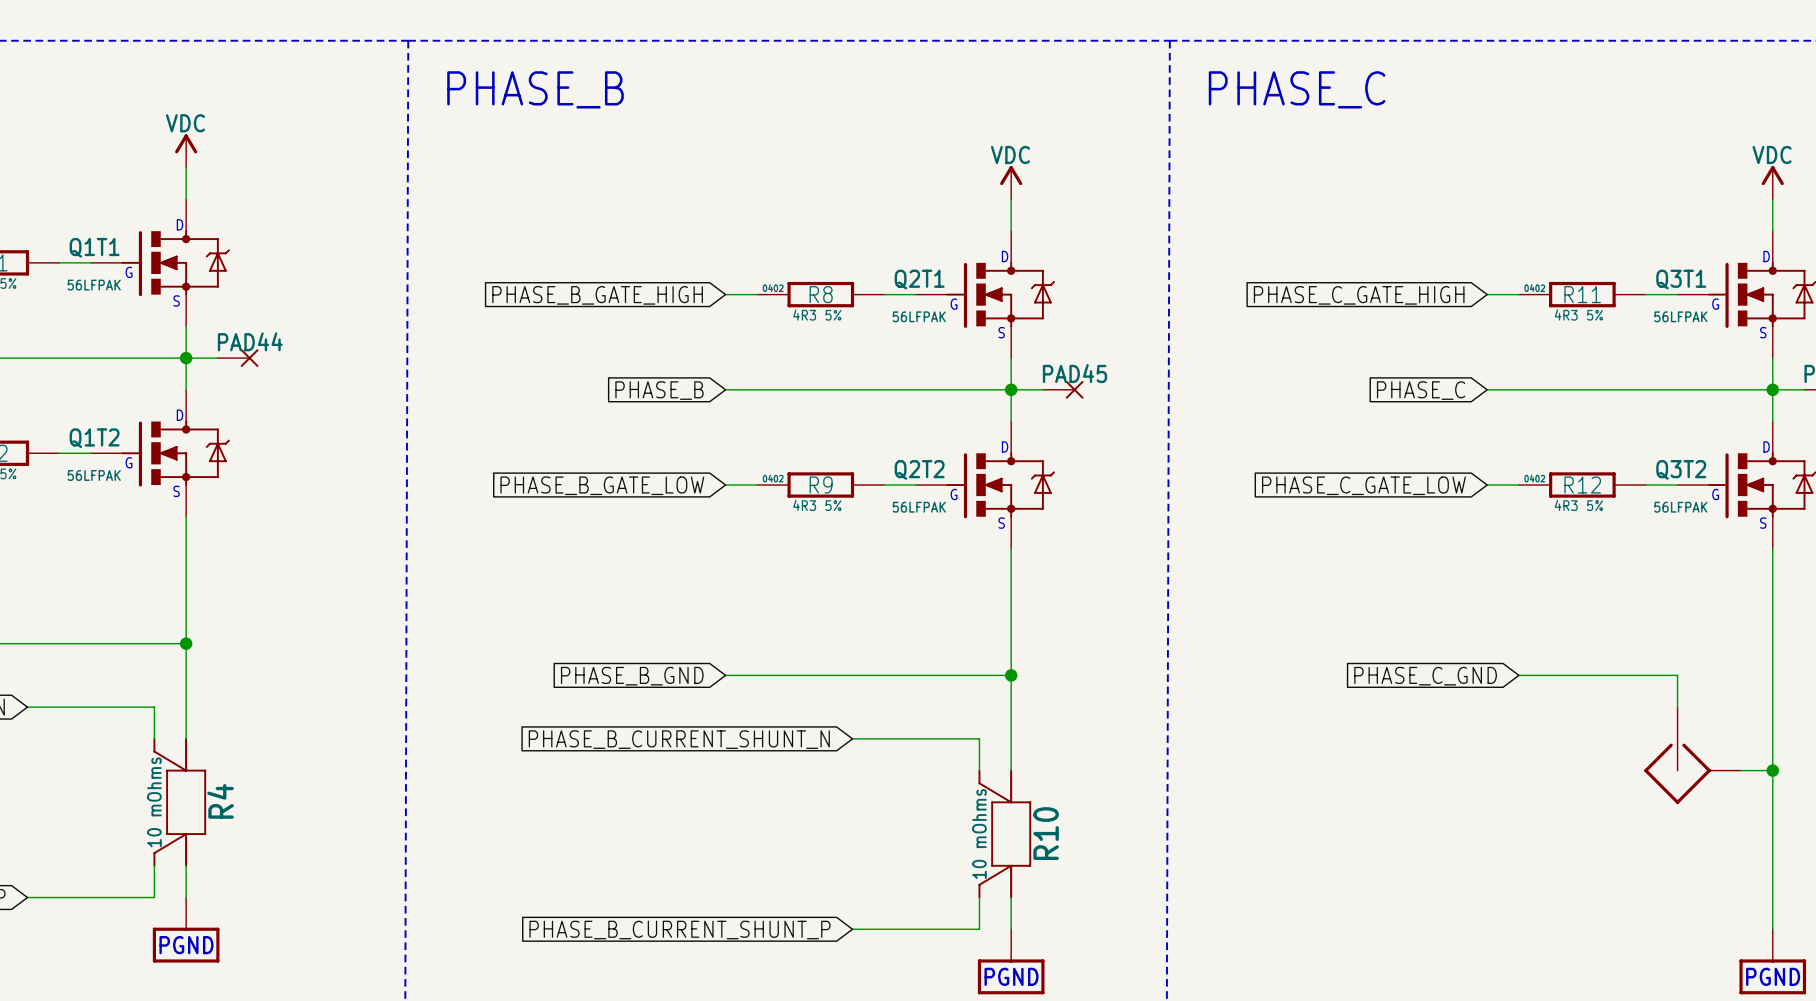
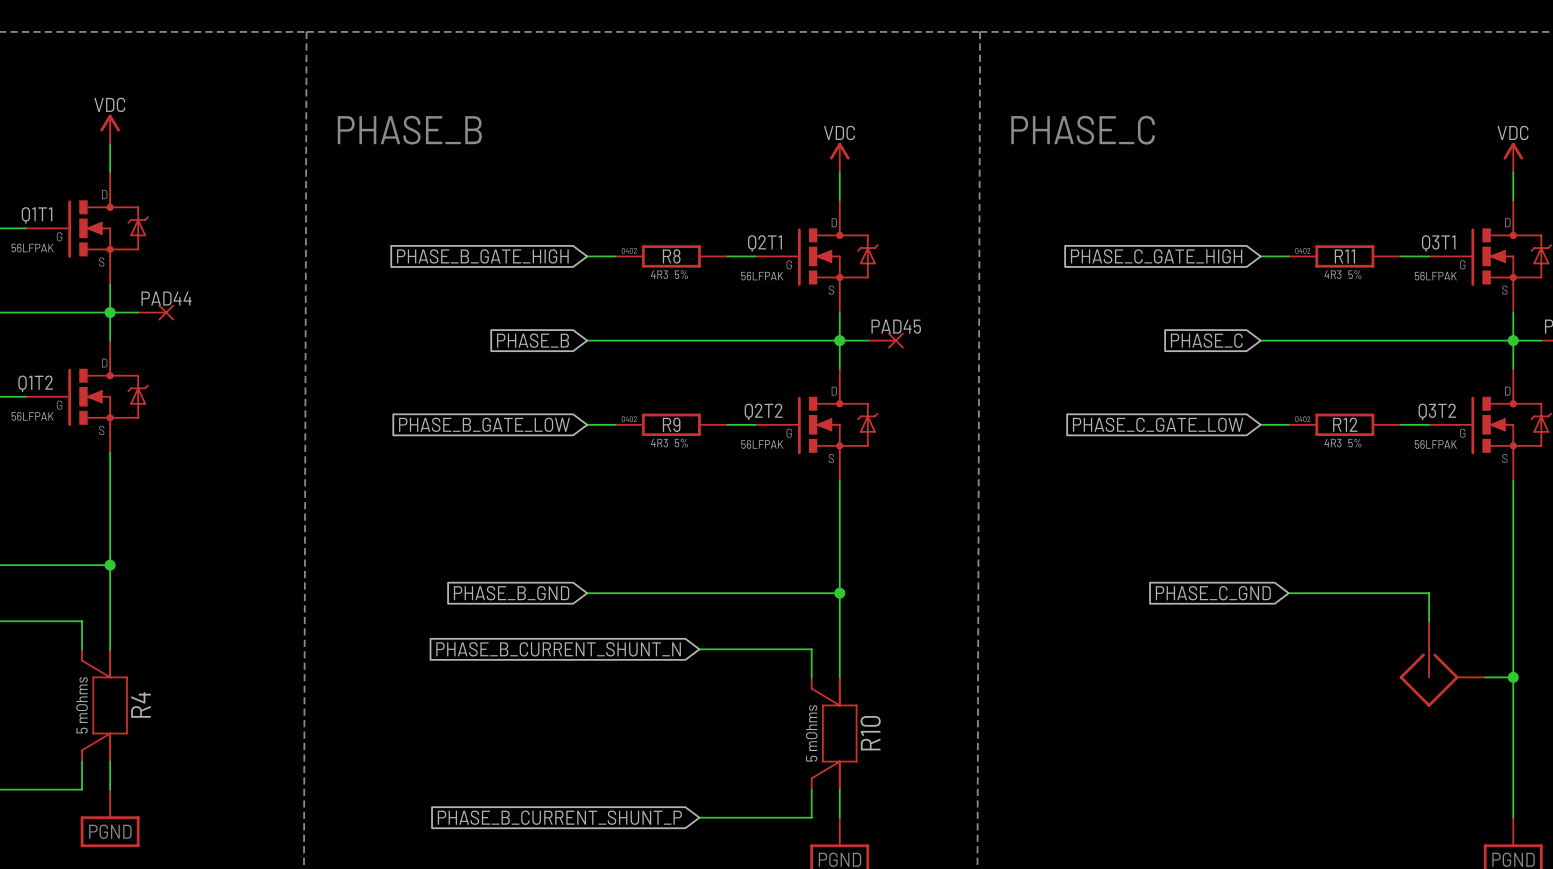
text position: PHASE_B (535, 89) -> PHASE_B (409, 130)
text position: PHASE_C (1297, 89) -> PHASE_C (1083, 130)
R4 value: 10 mOhms (154, 802) -> 5 mOhms (82, 705)
R10 value: 10 mOhms (979, 834) -> 5 mOhms (811, 733)

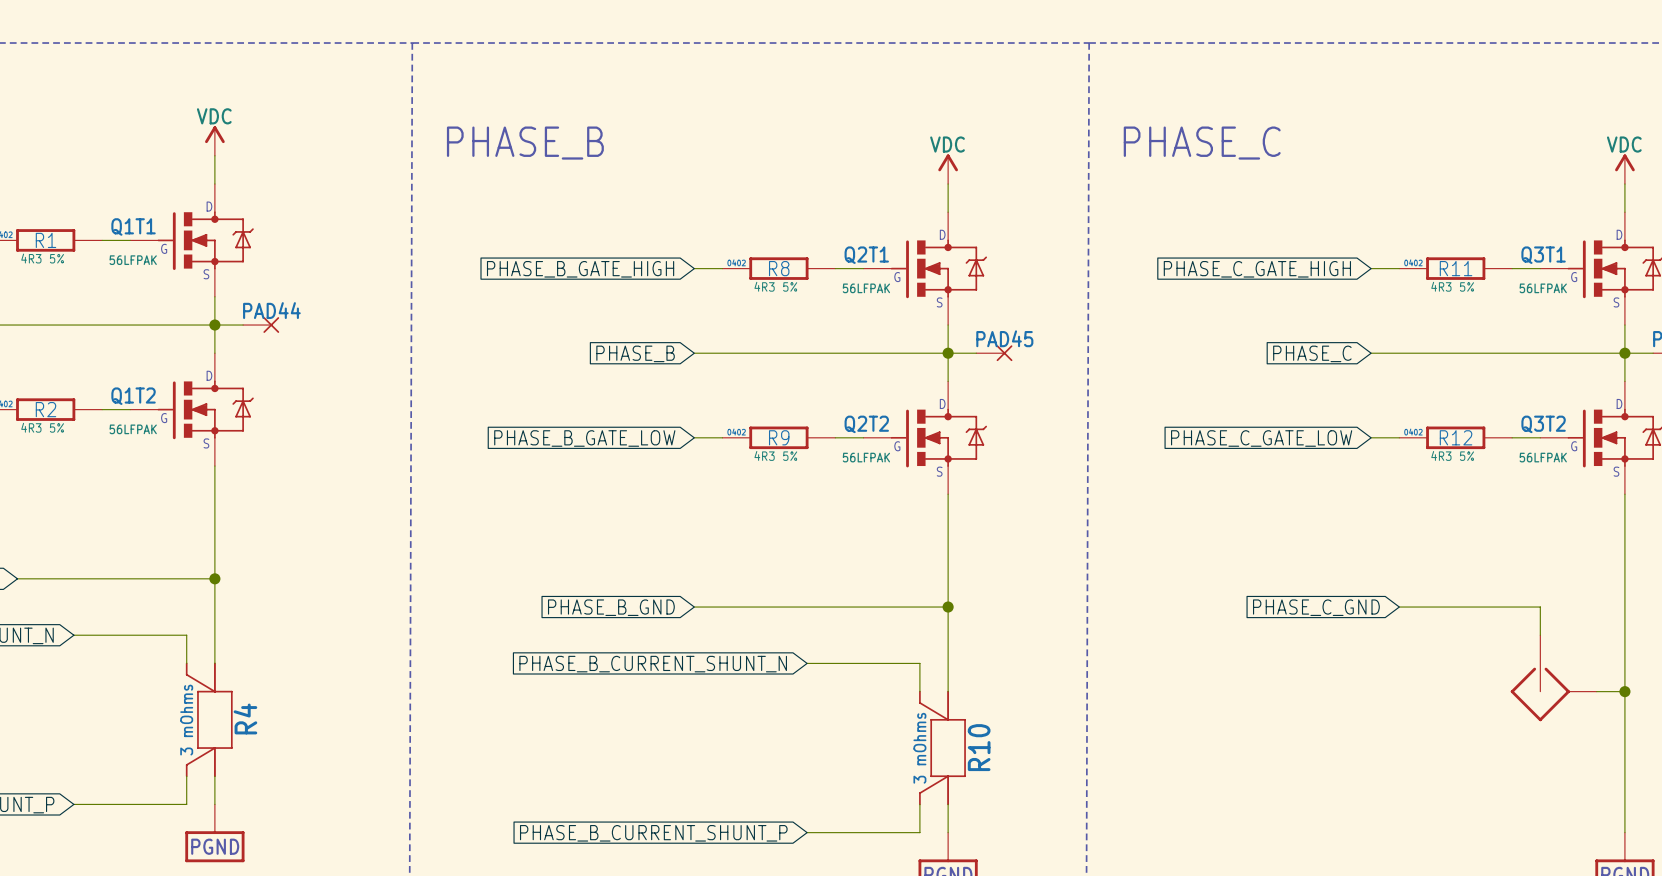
R4 value: 5 mOhms (82, 705) -> 3 mOhms (186, 720)
R10 value: 5 mOhms (811, 733) -> 3 mOhms (919, 748)

